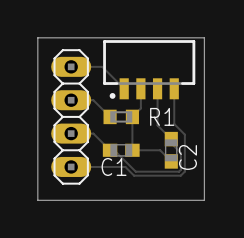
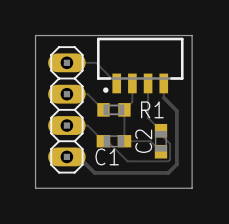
track: (174, 104) (174, 124) (184, 134) (184, 171) (180, 175) (134, 175) (125, 166) (83, 166) -> (163, 97) (176, 110) (176, 164) (168, 172) (94, 172) (78, 156)
C2 name position: C2 (187, 157) -> C2 (143, 141)

